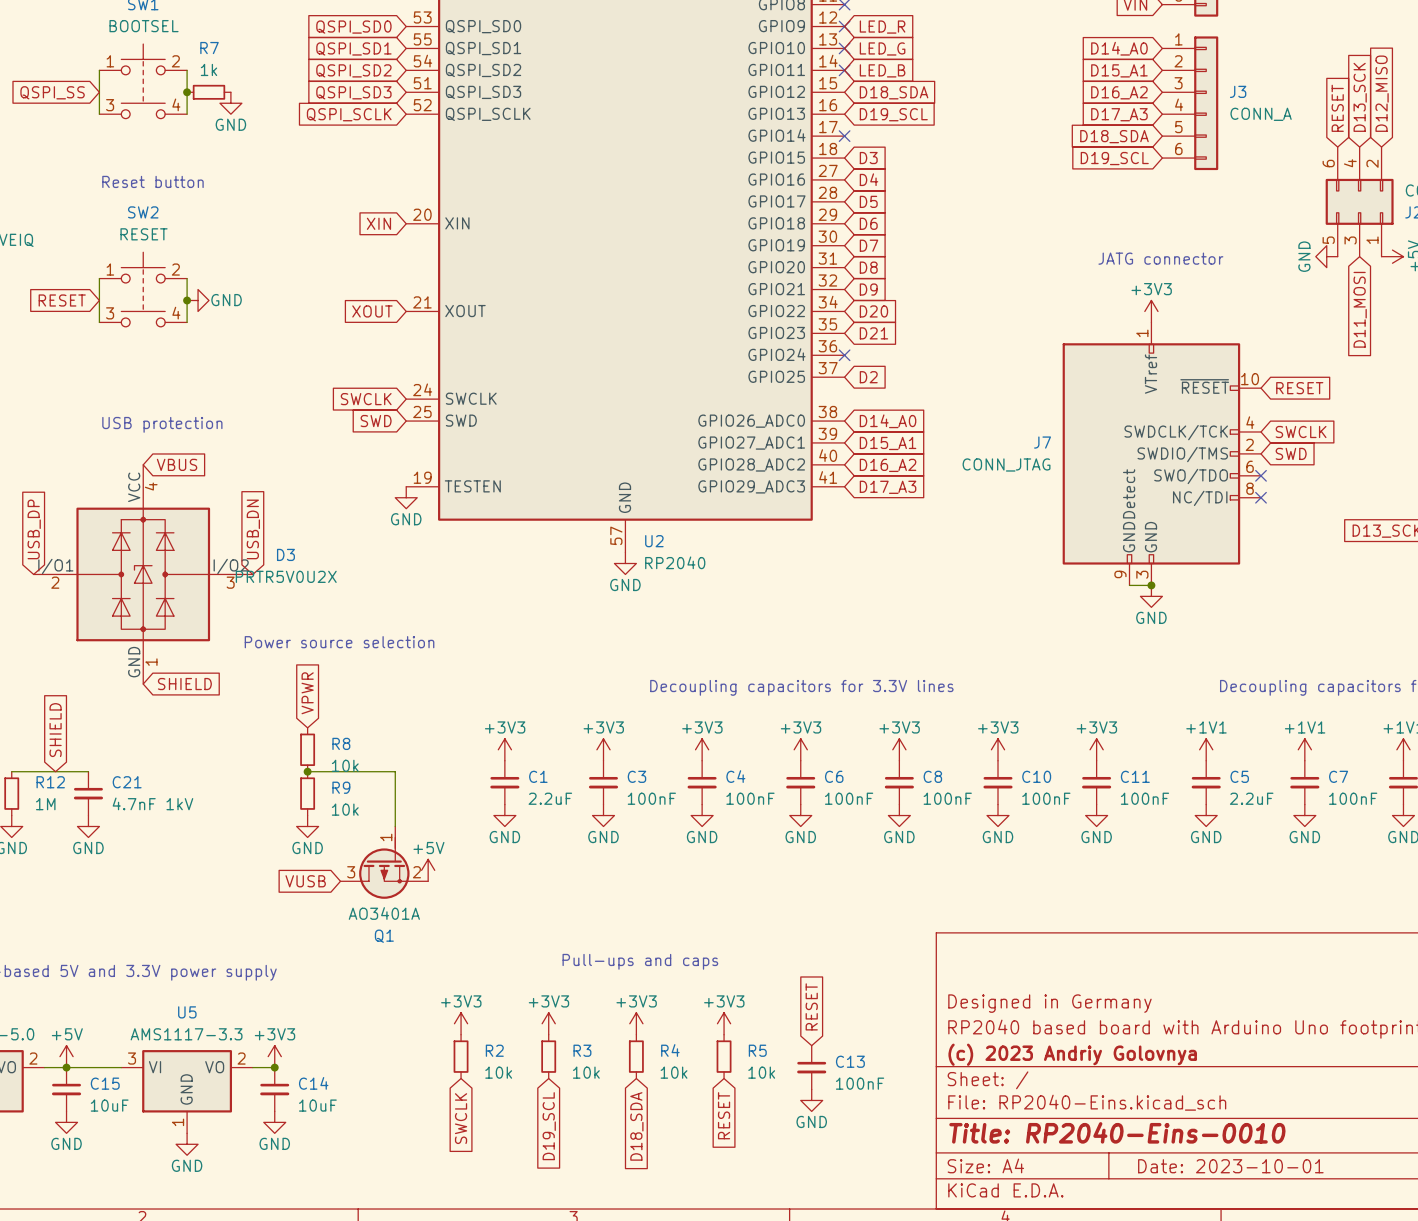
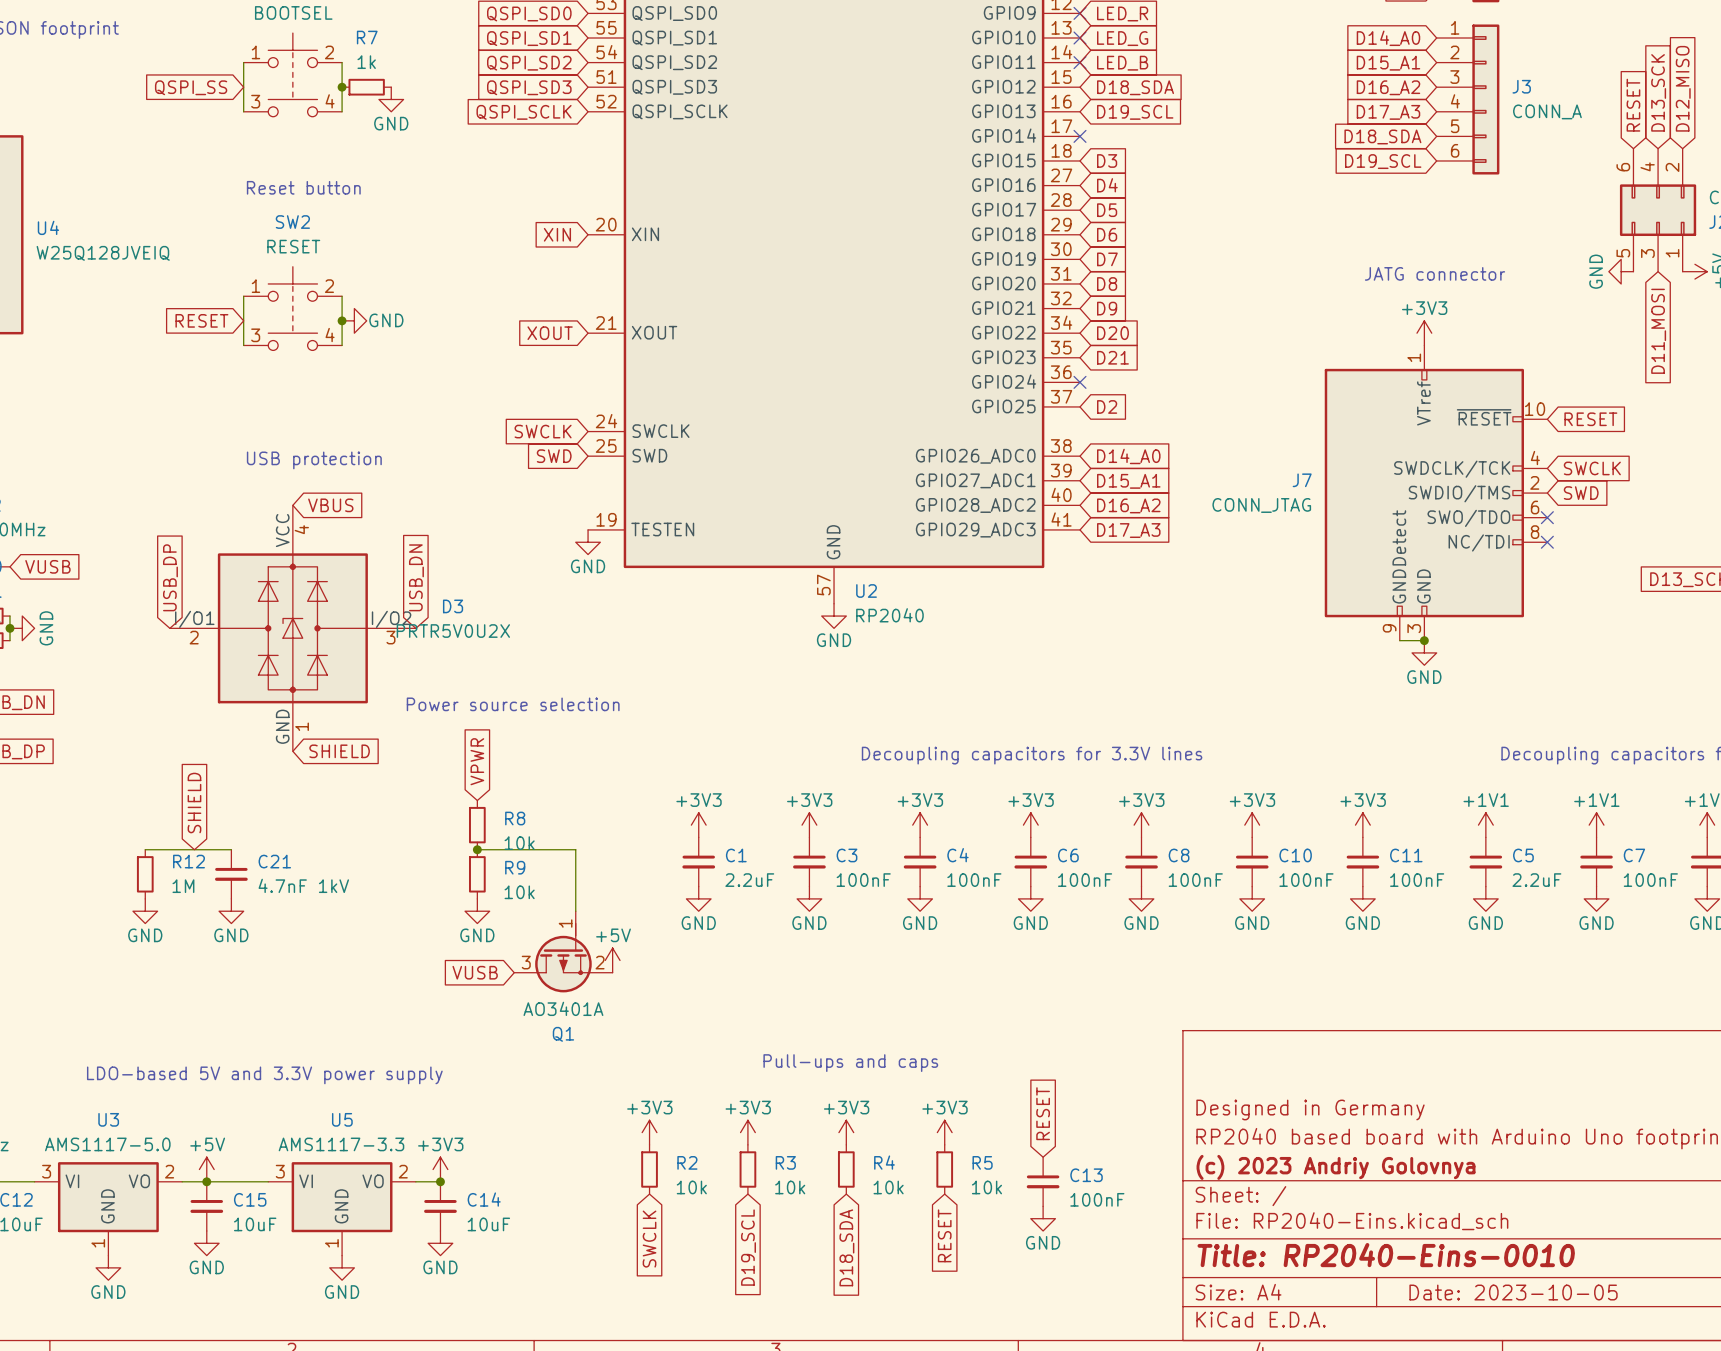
title block: Date: 2023-10-01 (1230, 1166) -> Date: 2023-10-05 (1513, 1292)

